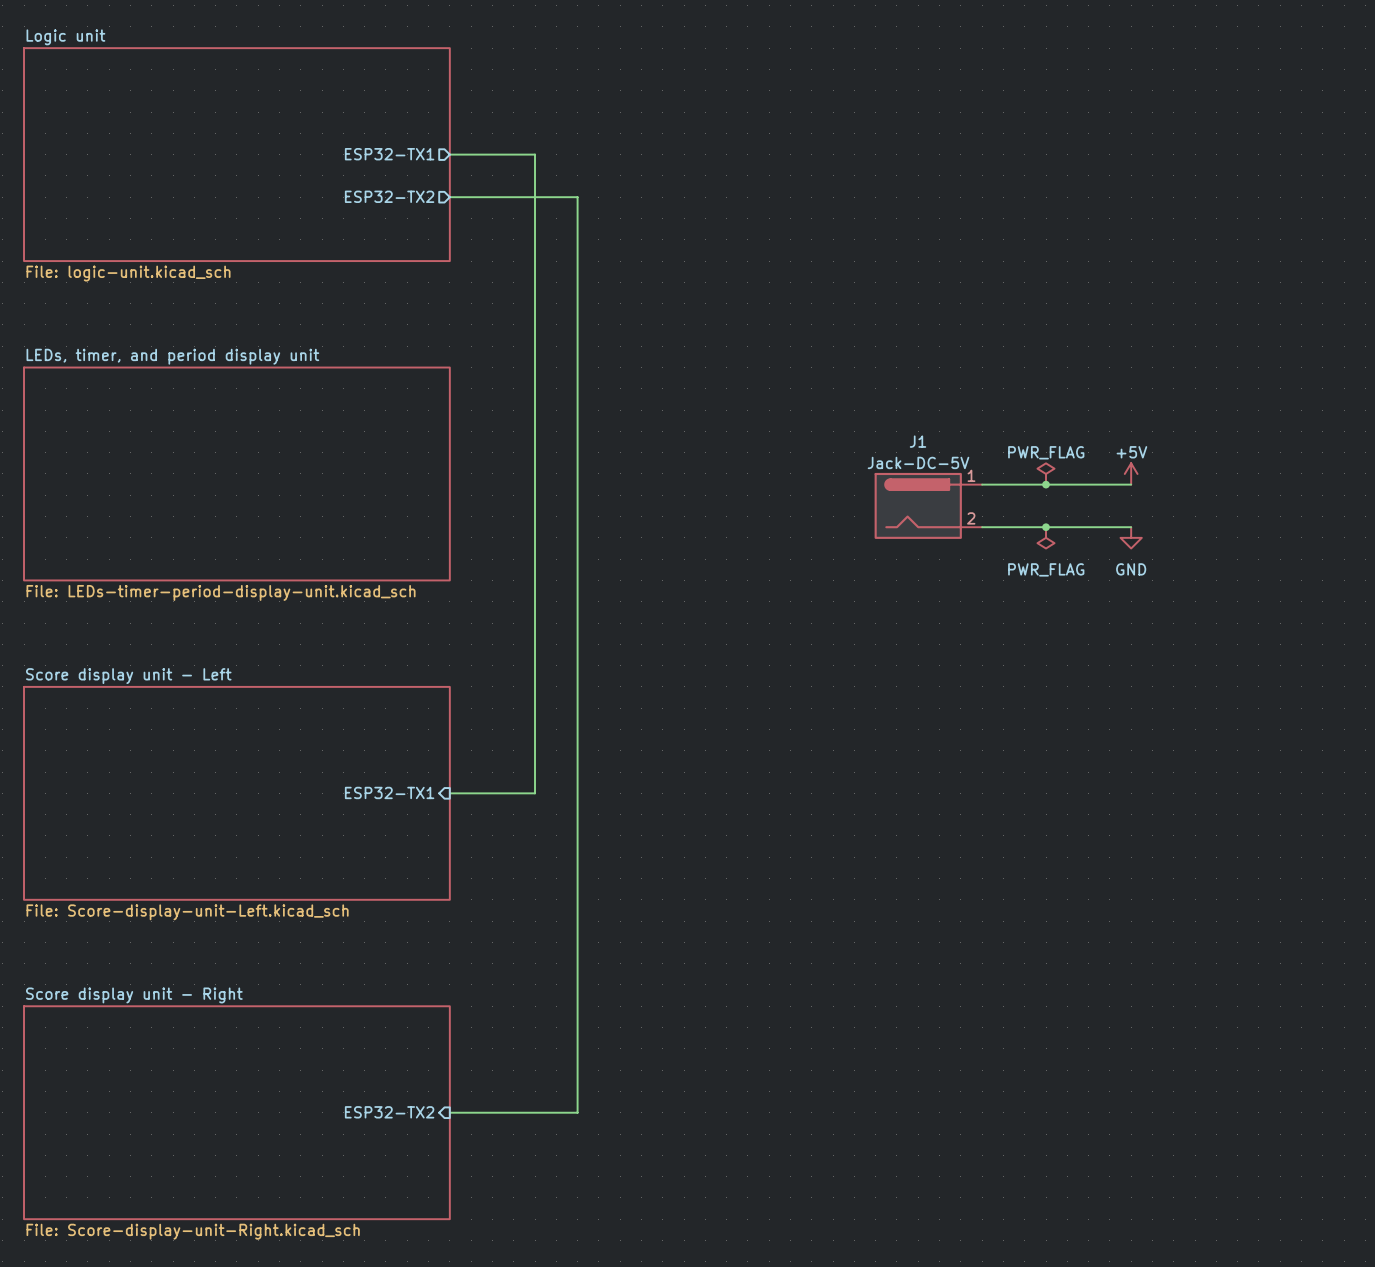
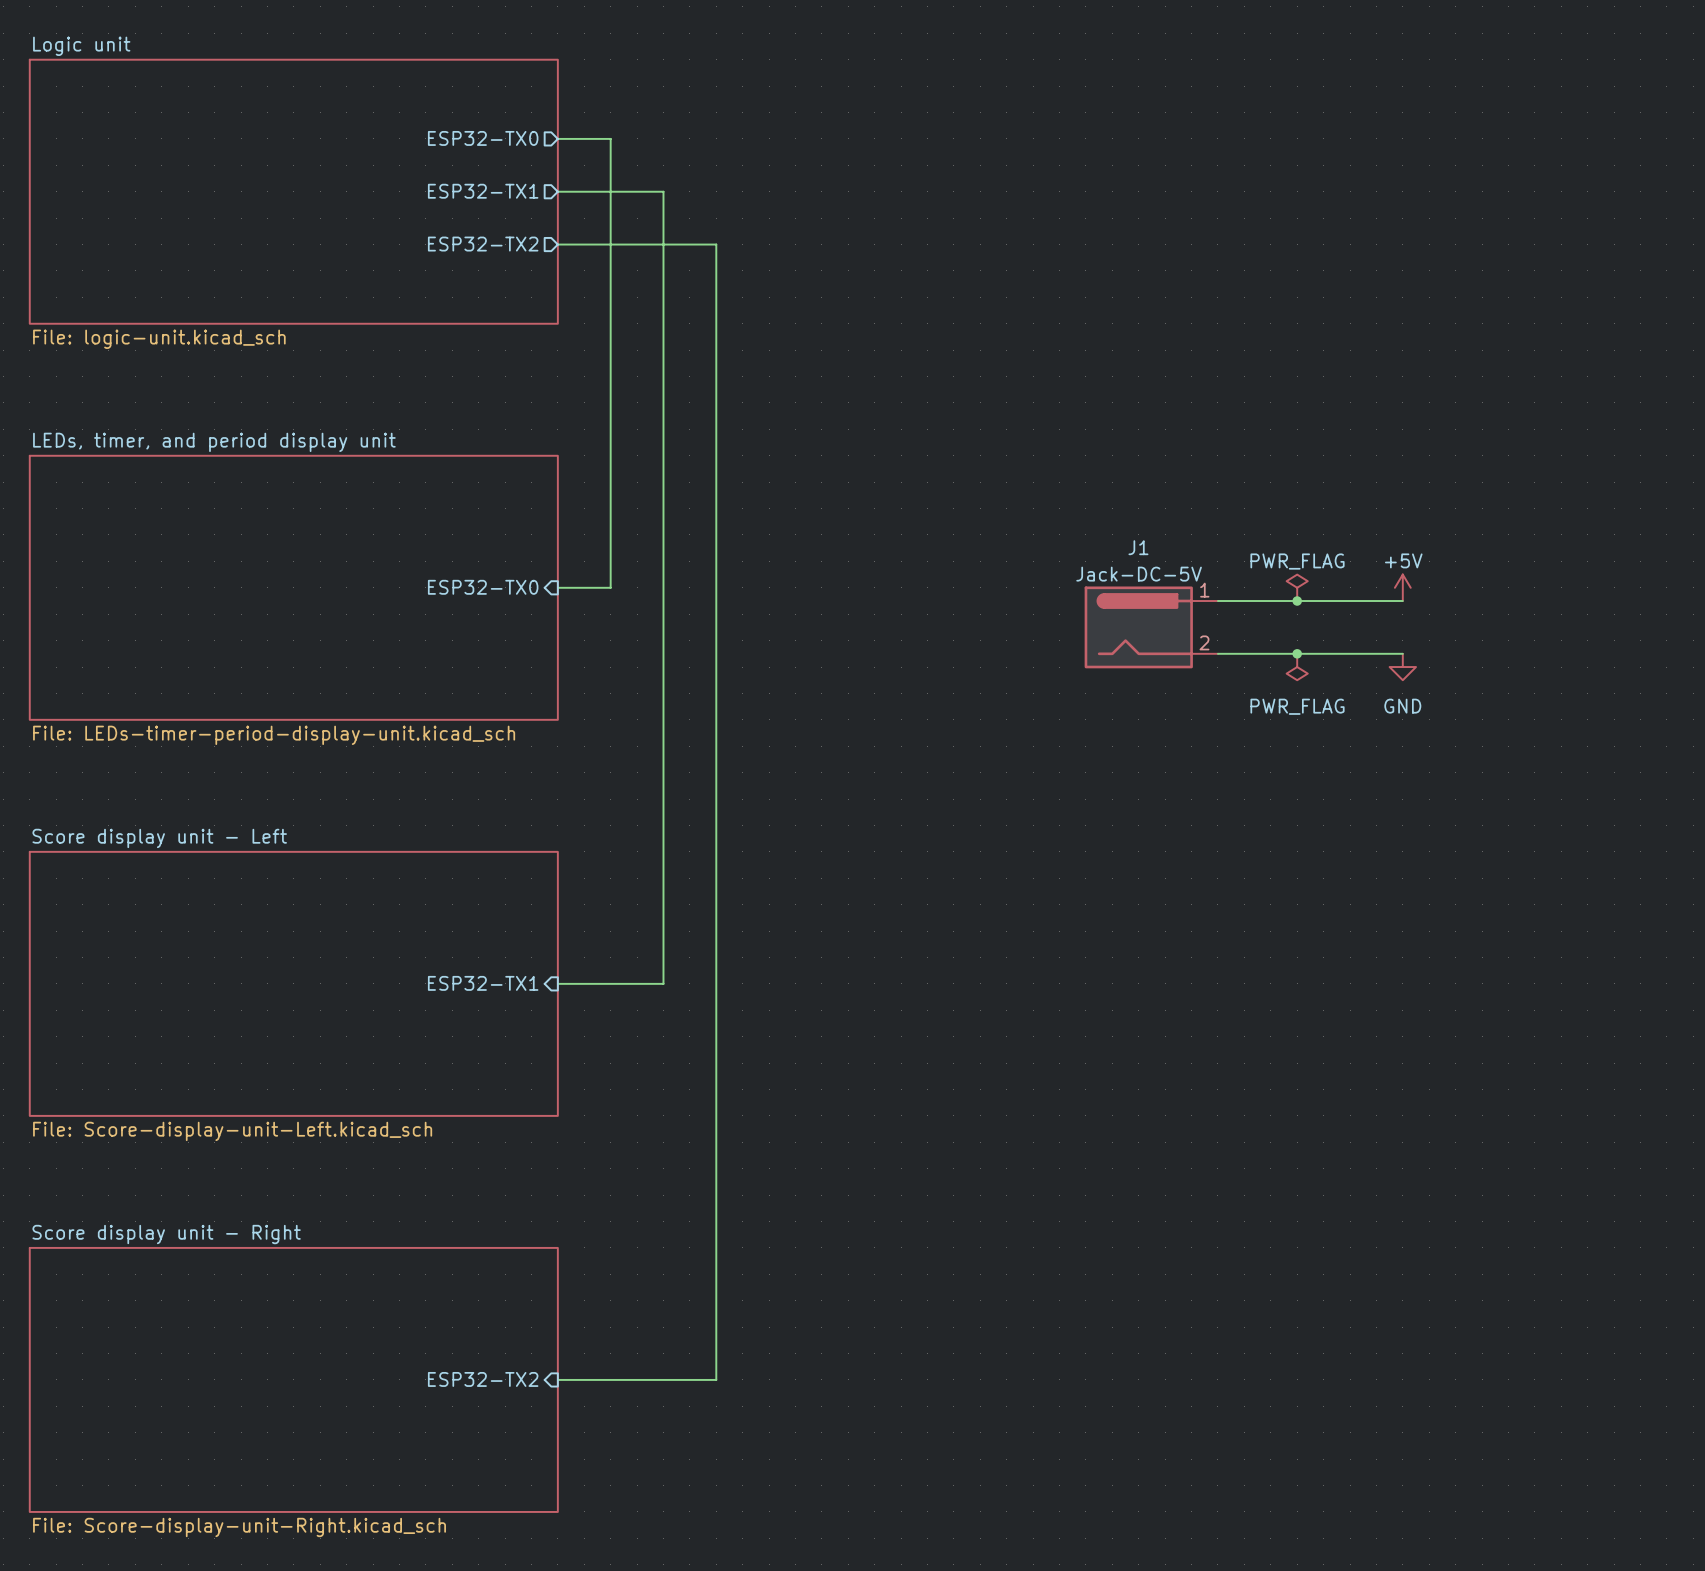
sheet pin: none -> ESP32-TX0 (483, 138)
wire: none -> (557, 138) (610, 138) (610, 587) (557, 587)
sheet pin: none -> ESP32-TX0 (483, 587)

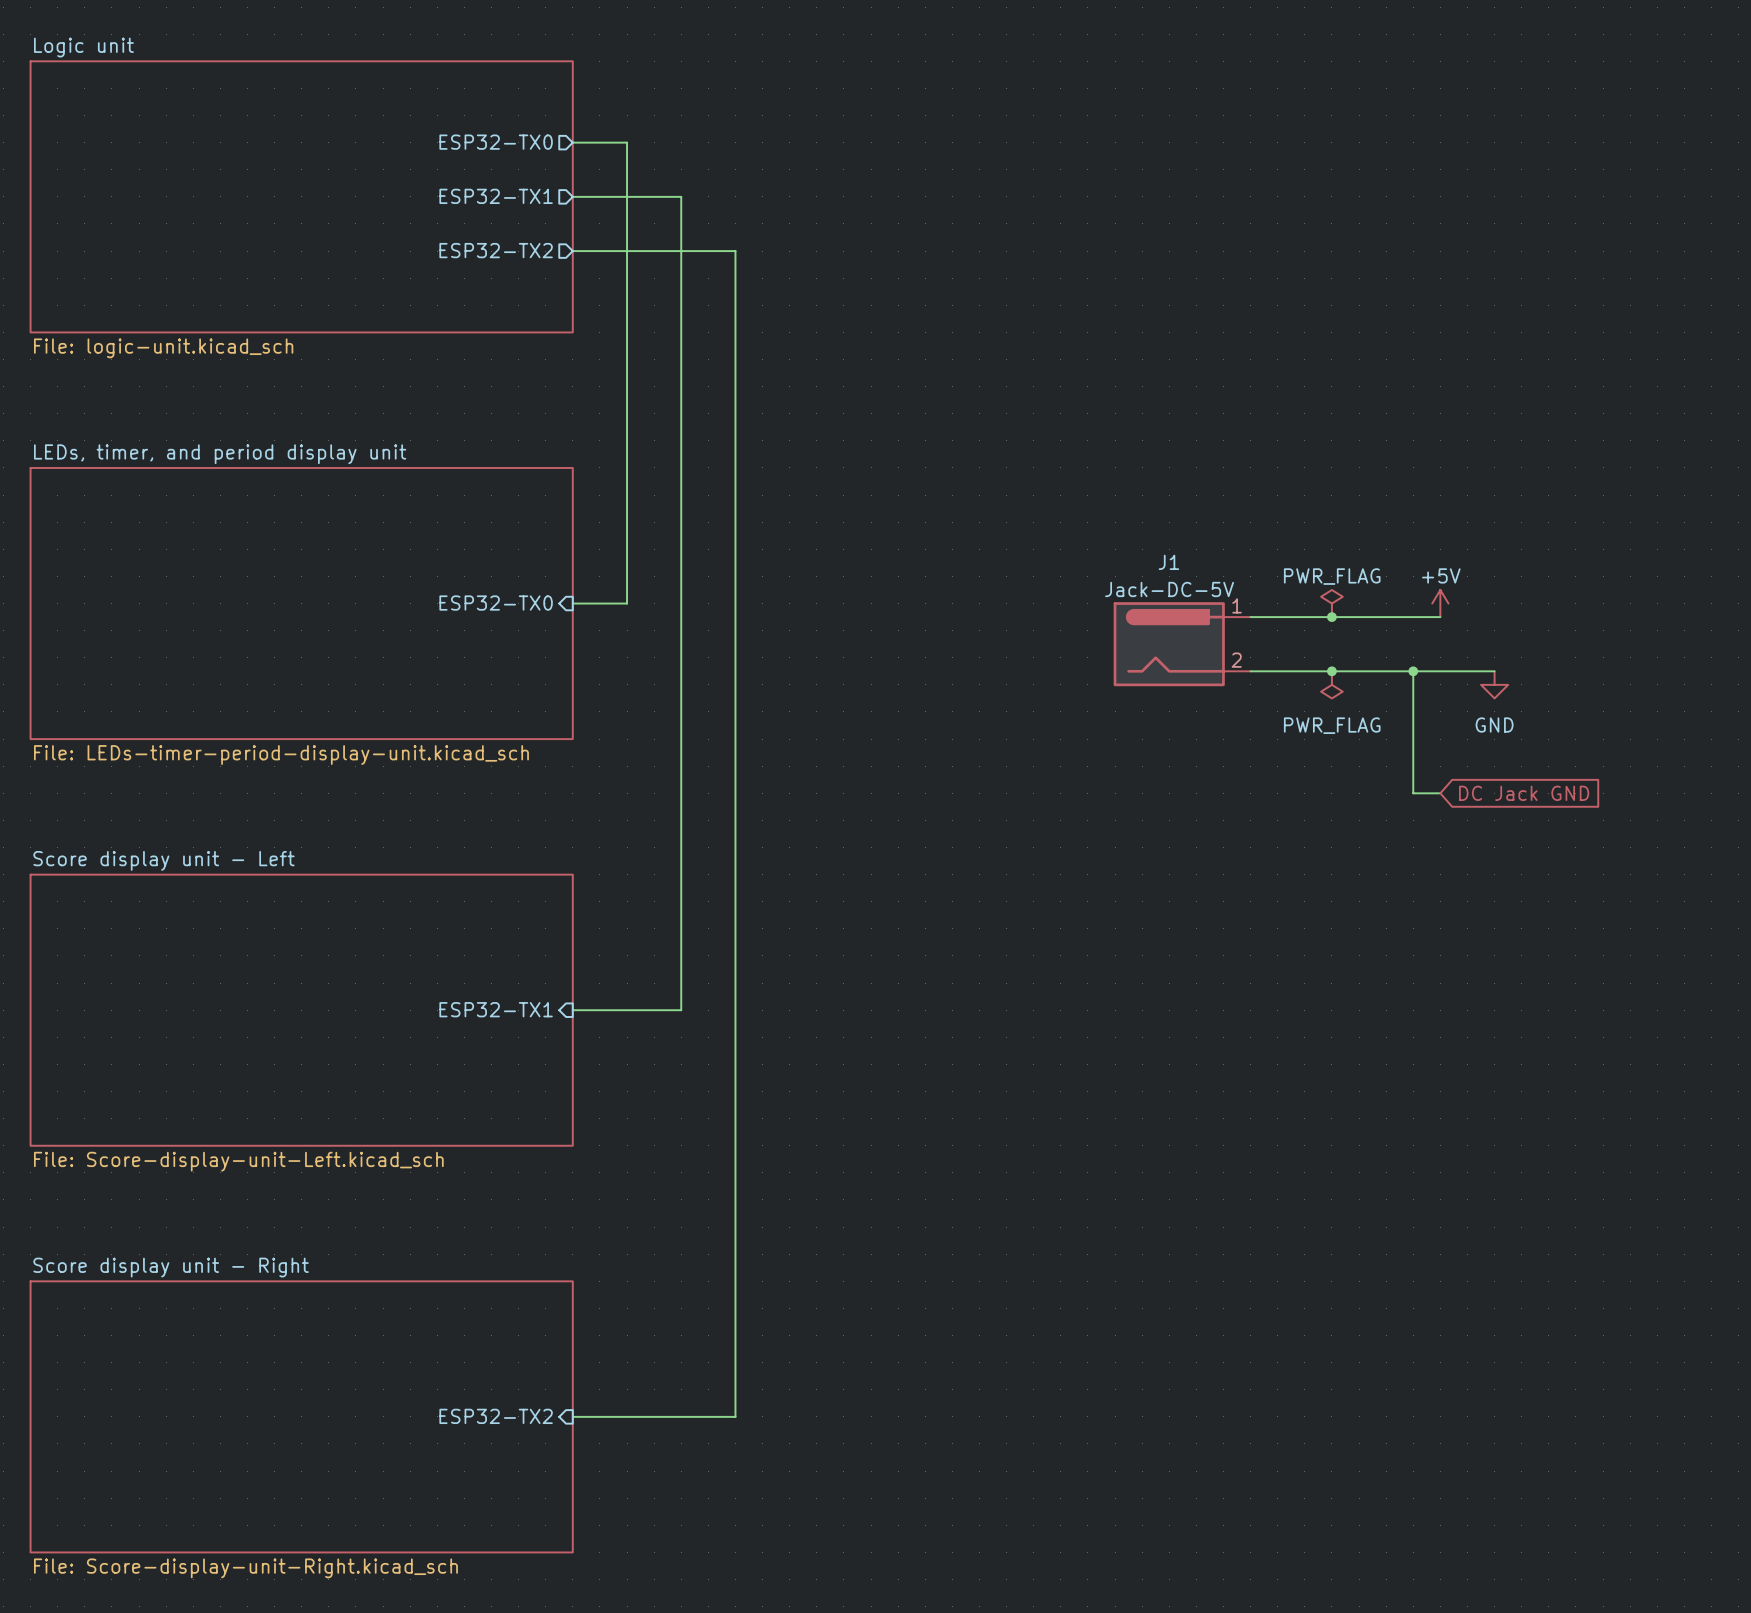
wire: none -> (1413, 671) (1413, 793) (1440, 793)
junction: none -> (1413, 671)
wire: none -> (1440, 671) (1494, 671)
power symbol position: GND (1402, 667) -> GND (1494, 684)
global label: none -> DC Jack GND (1524, 793)

